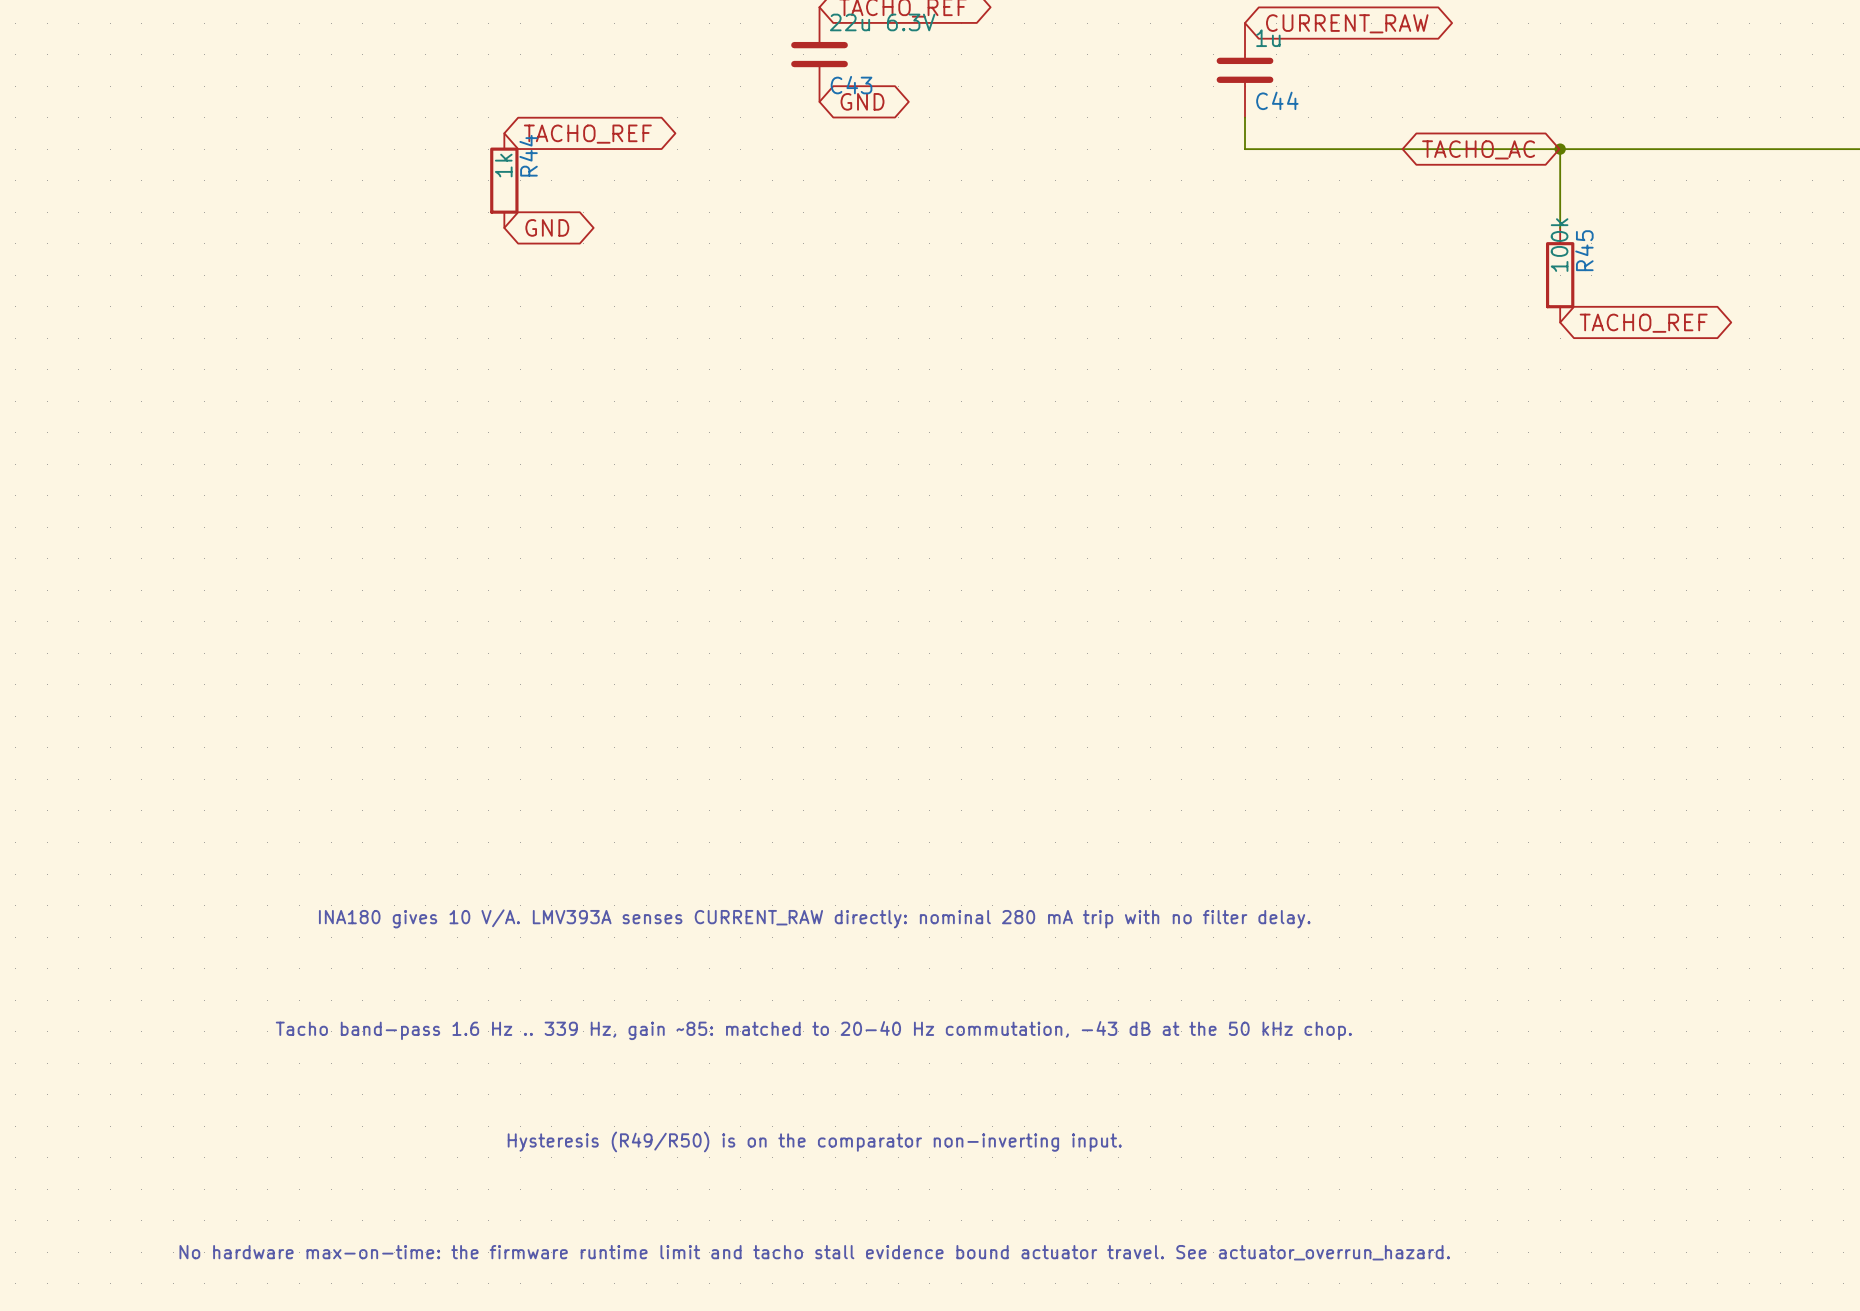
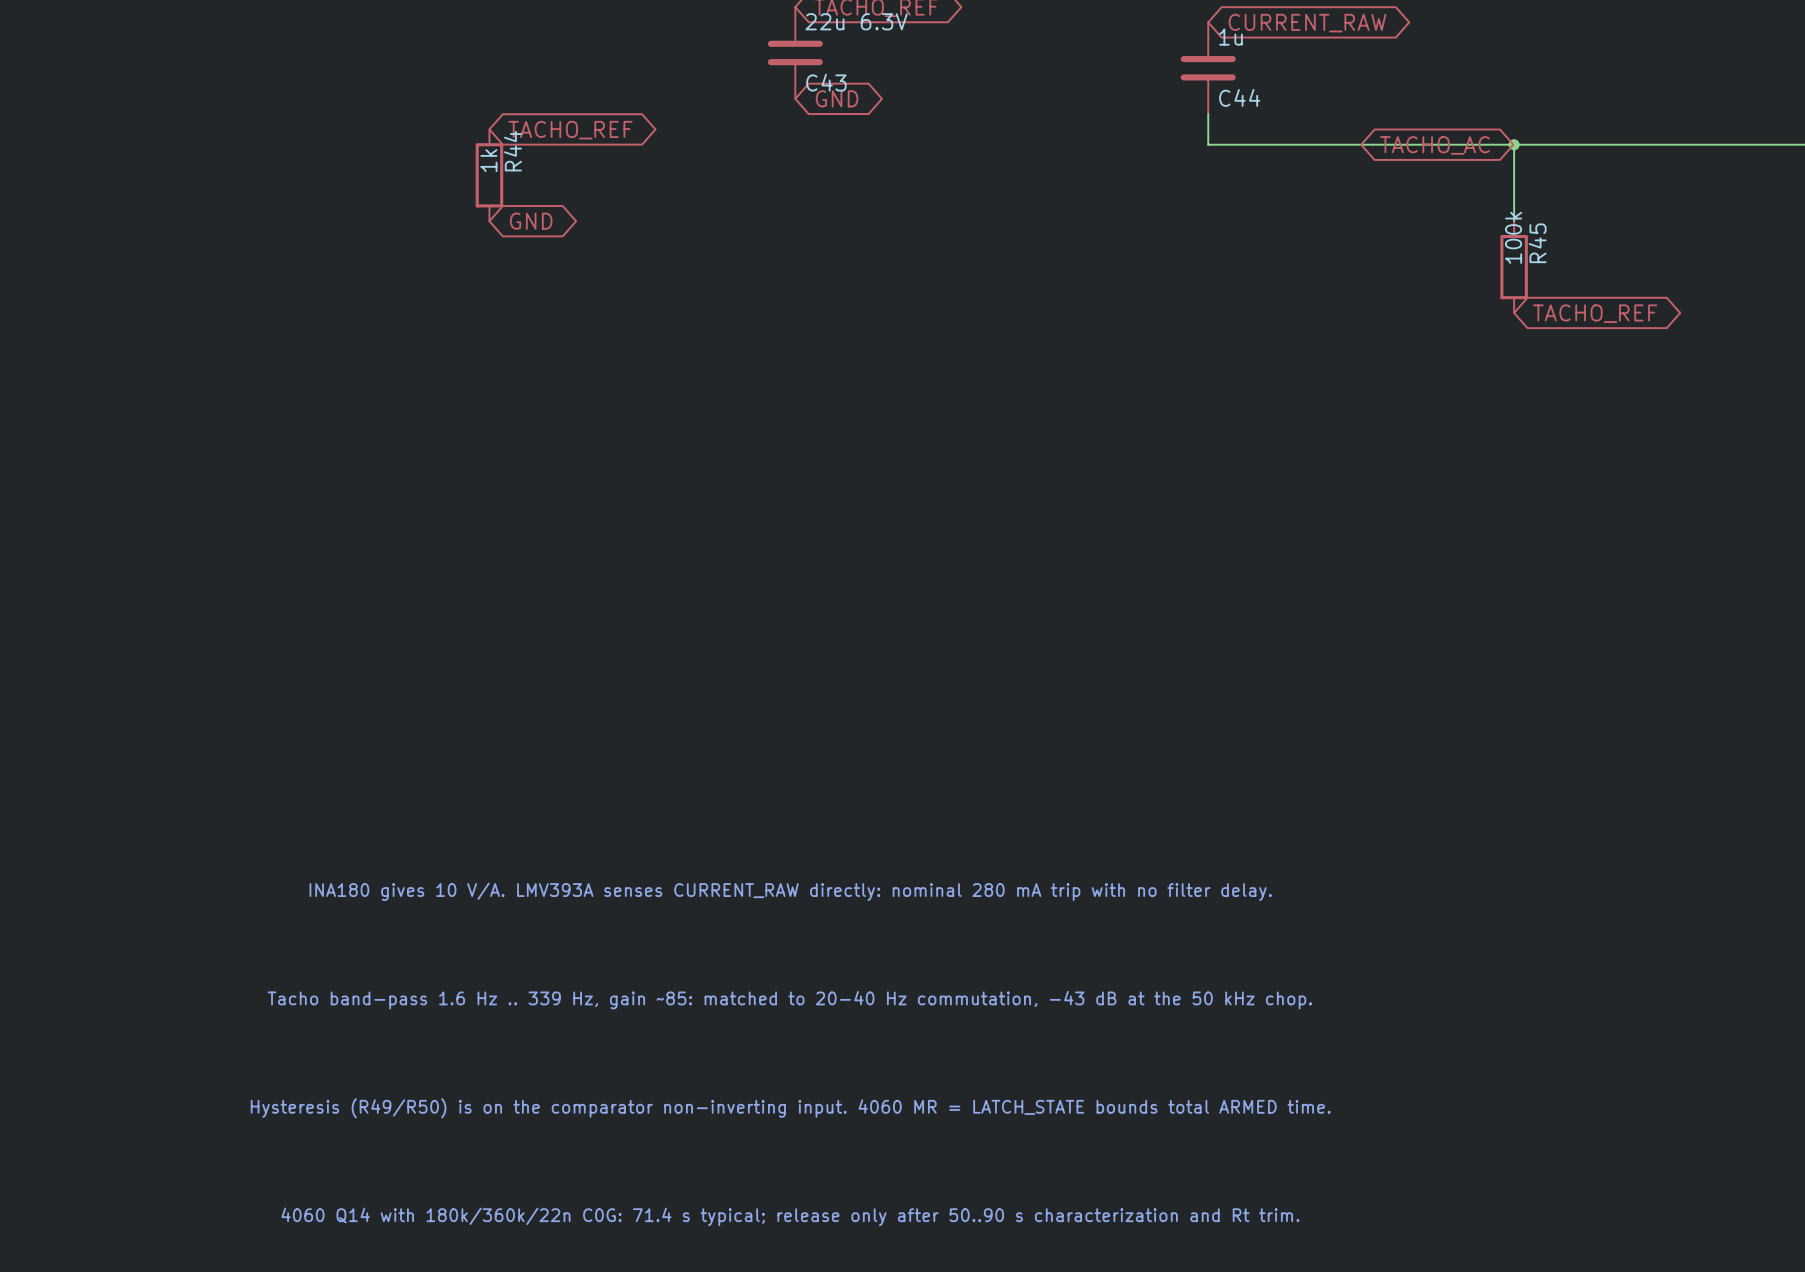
text: Hysteresis (R49/R50) is on the comparator non-inverting input. (814, 1141) -> Hysteresis (R49/R50) is on the comparator non-inverting input. 4060 MR = LATCH_STATE bounds total ARMED time. (790, 1108)
text: No hardware max-on-time: the firmware runtime limit and tacho stall evidence bound actuator travel. See actuator_overrun_hazard. (814, 1252) -> 4060 Q14 with 180k/360k/22n C0G: 71.4 s typical; release only after 50..90 s characterization and Rt trim. (790, 1216)

